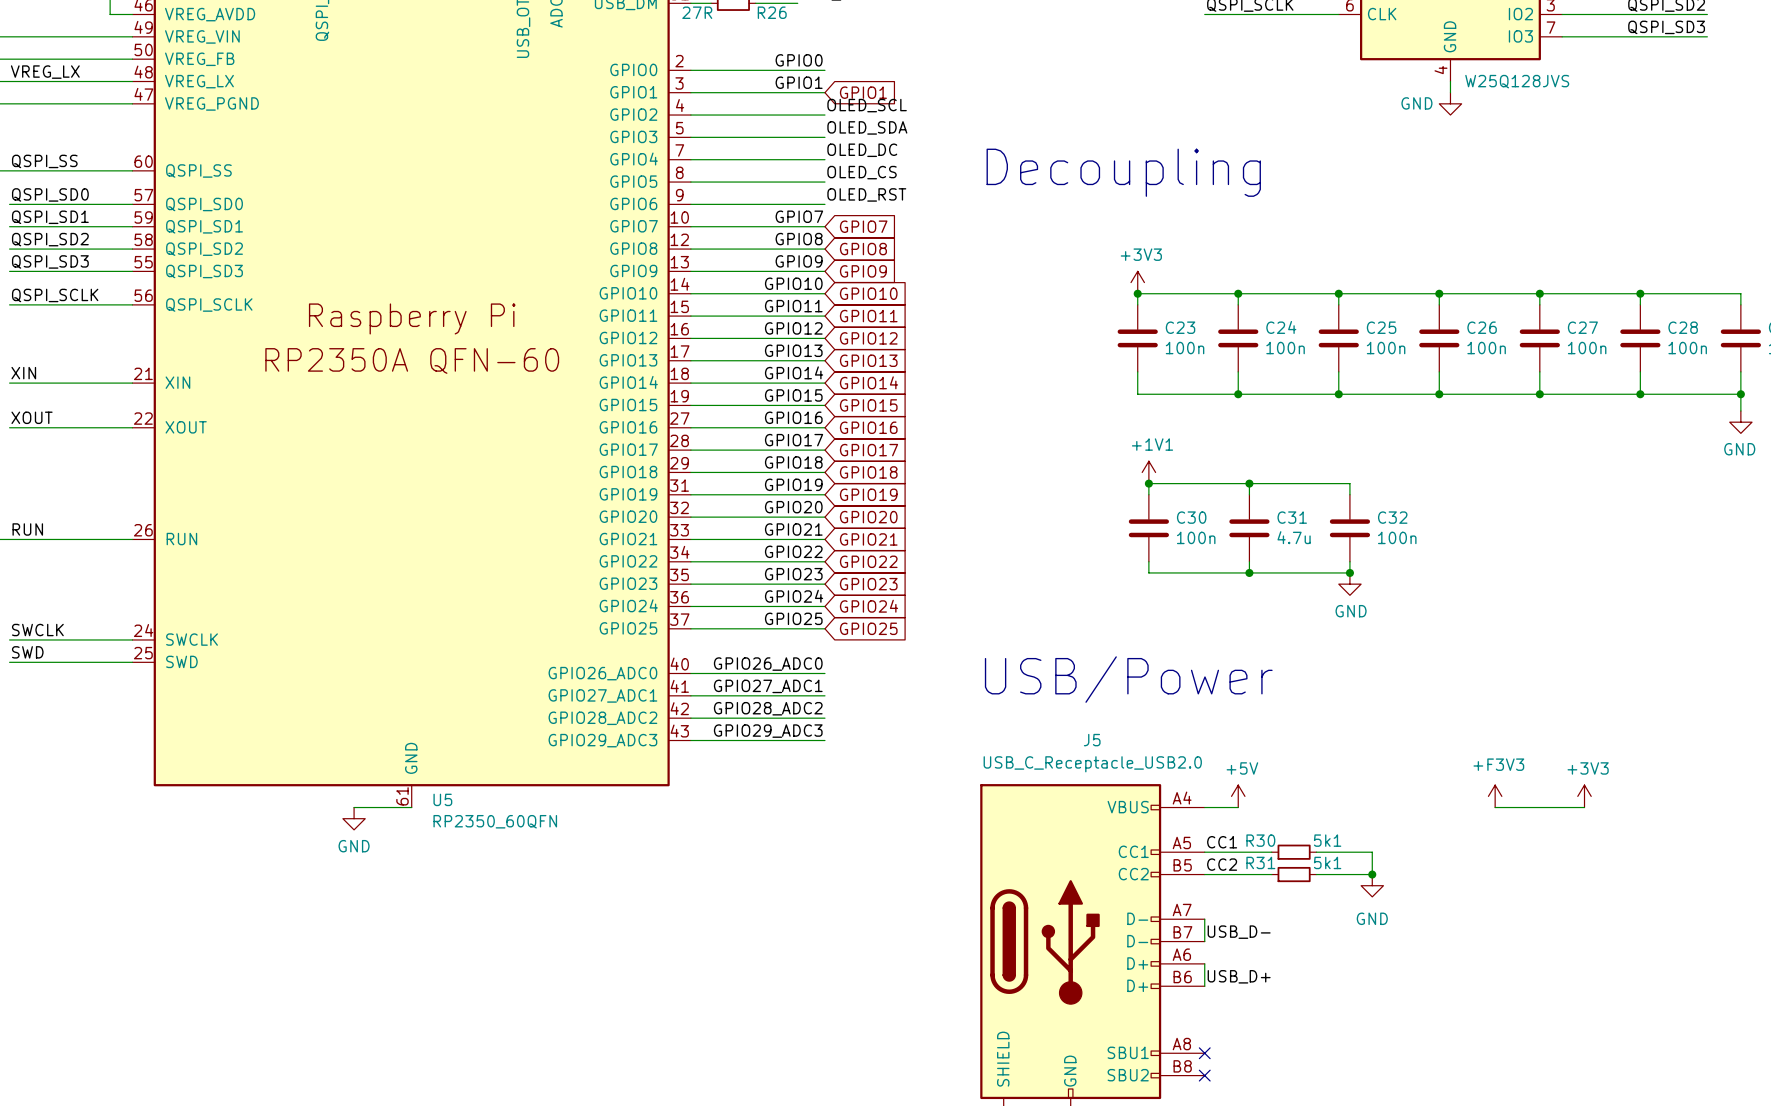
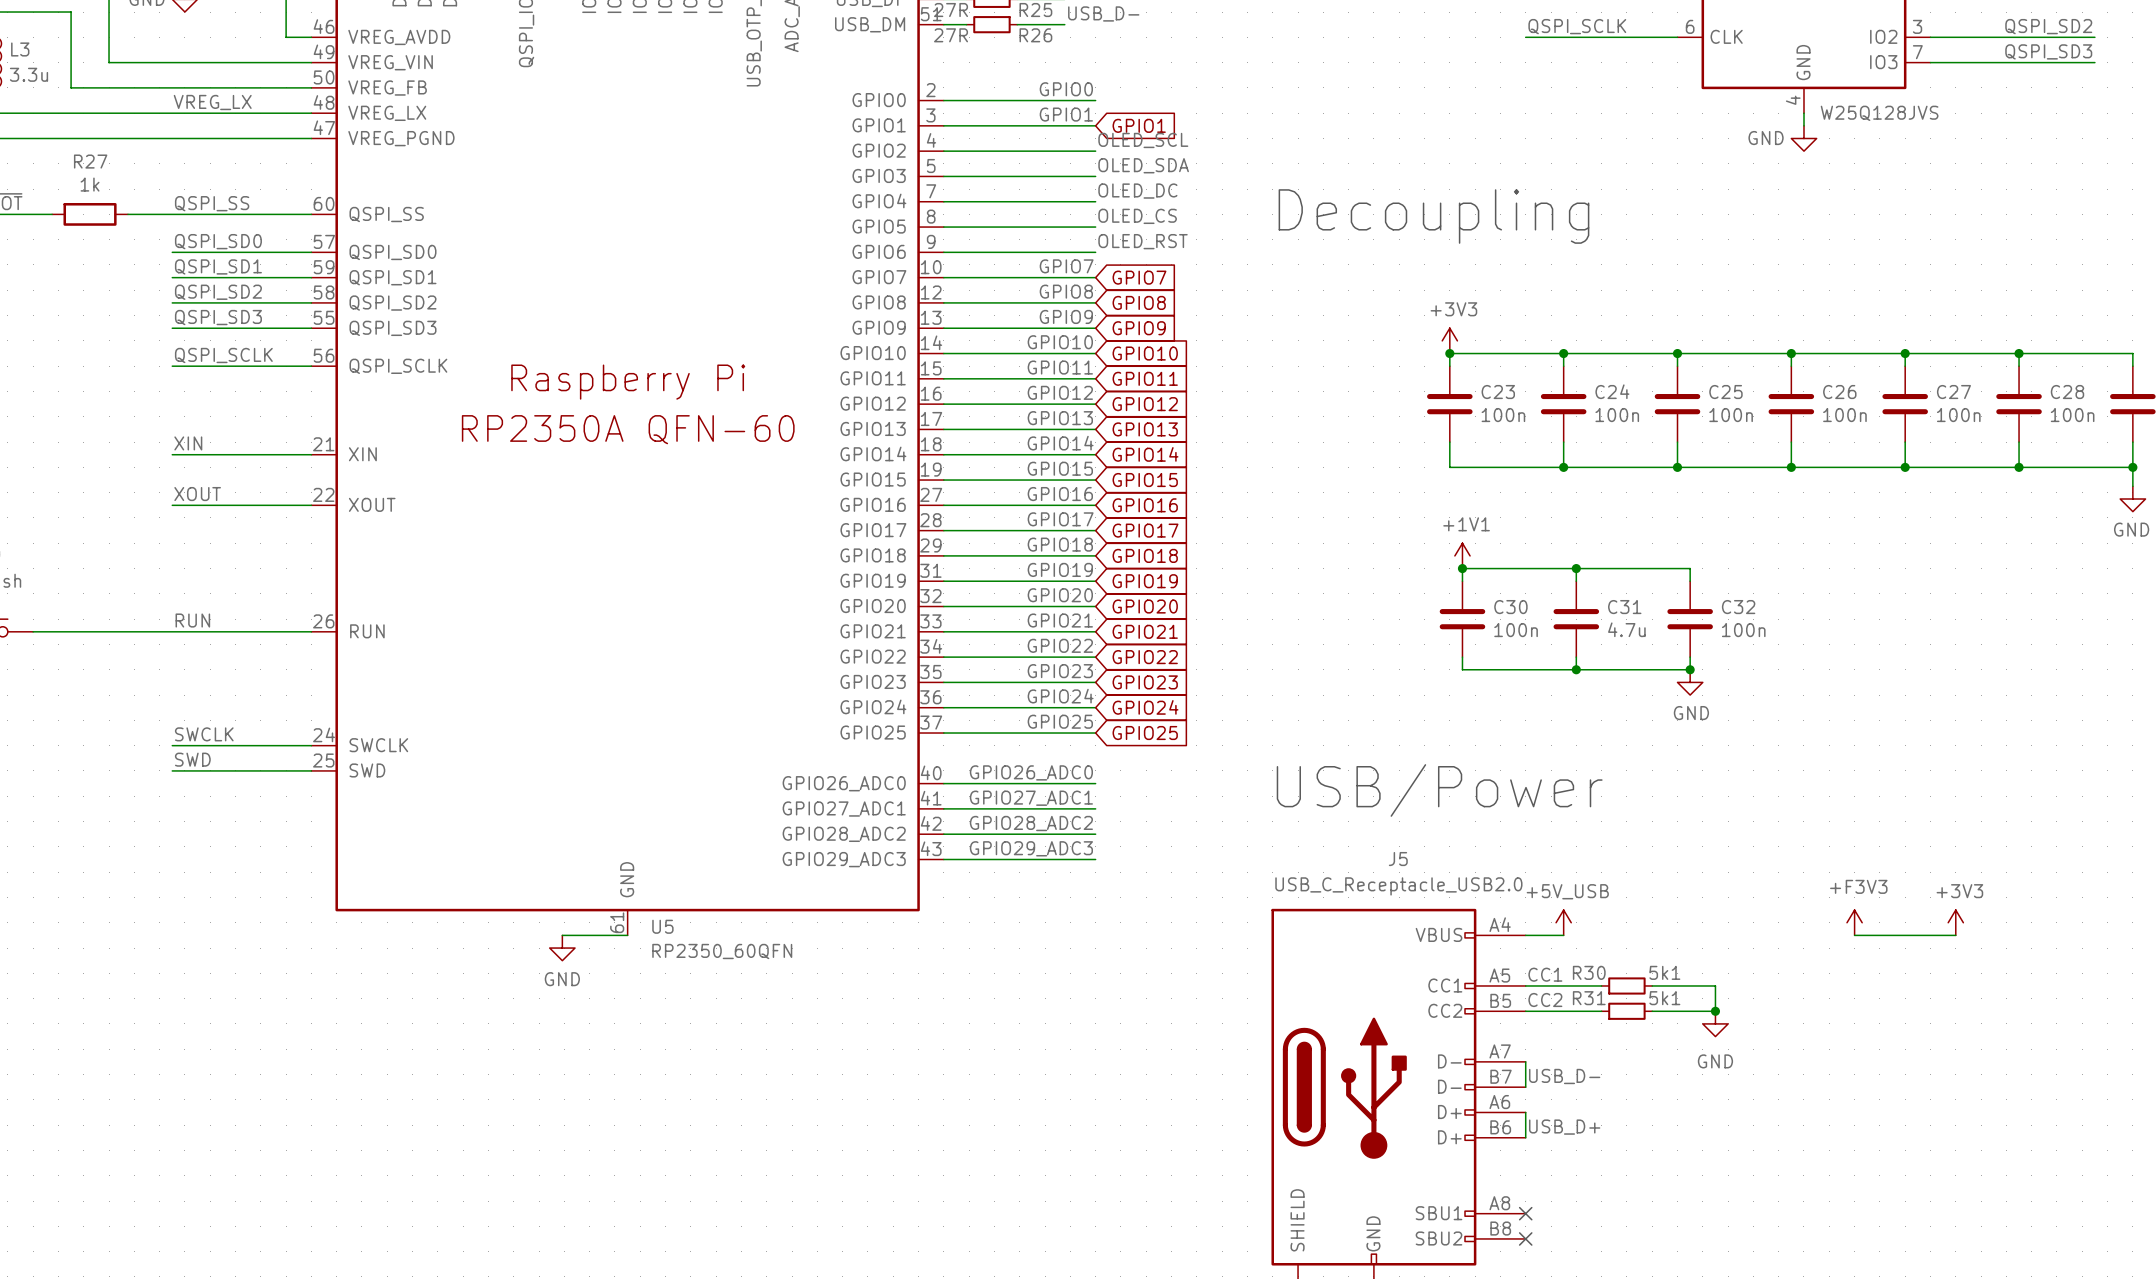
power symbol: +5V (1238, 796) -> +5V_USB (1563, 922)

